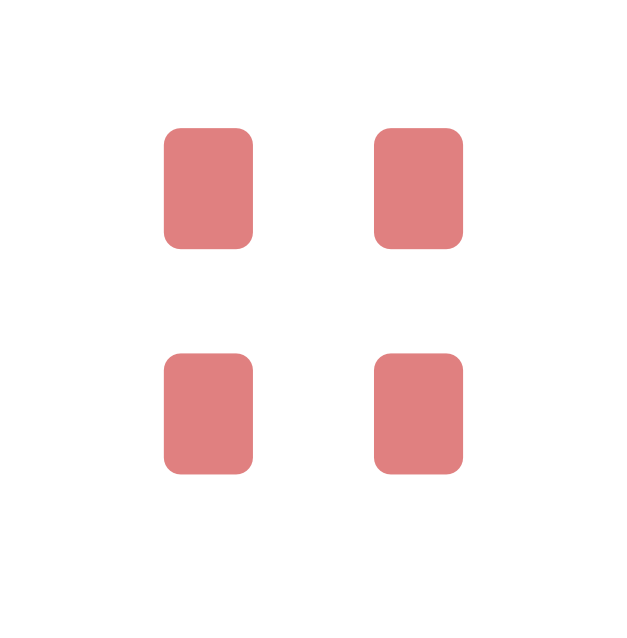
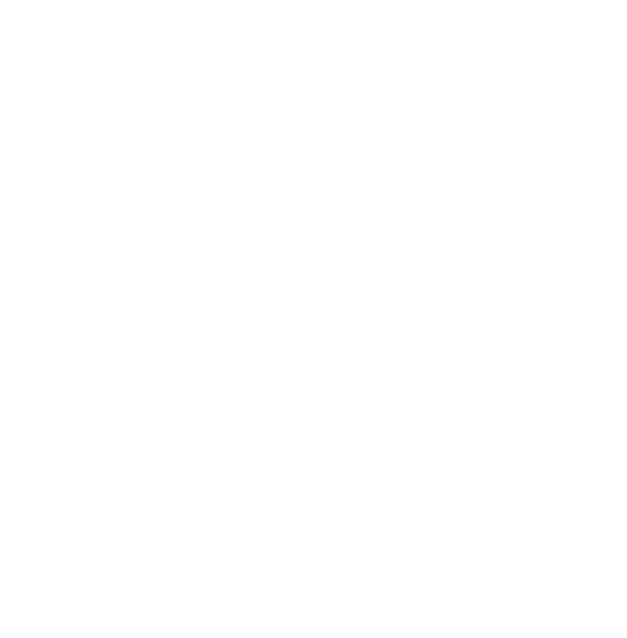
part: (313, 188) -> none
part: (313, 413) -> none

